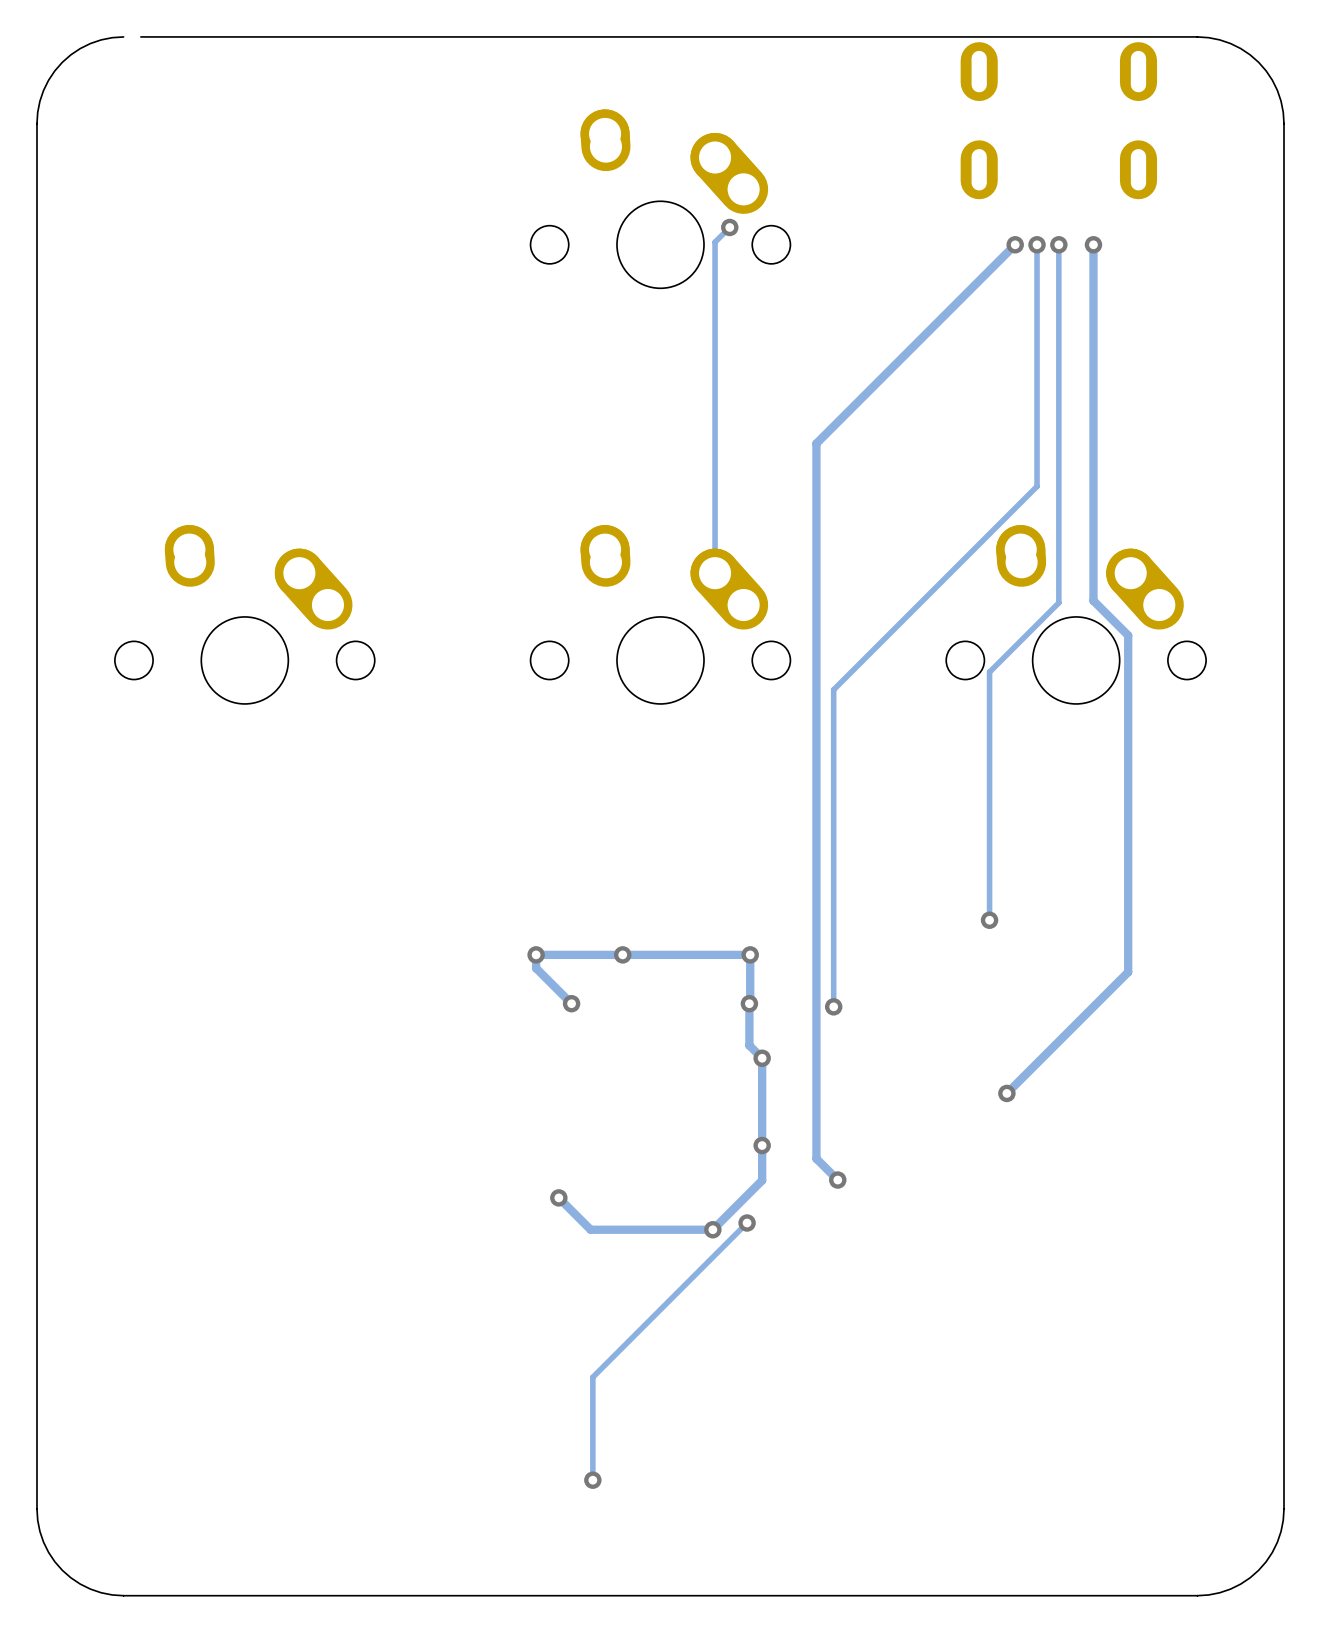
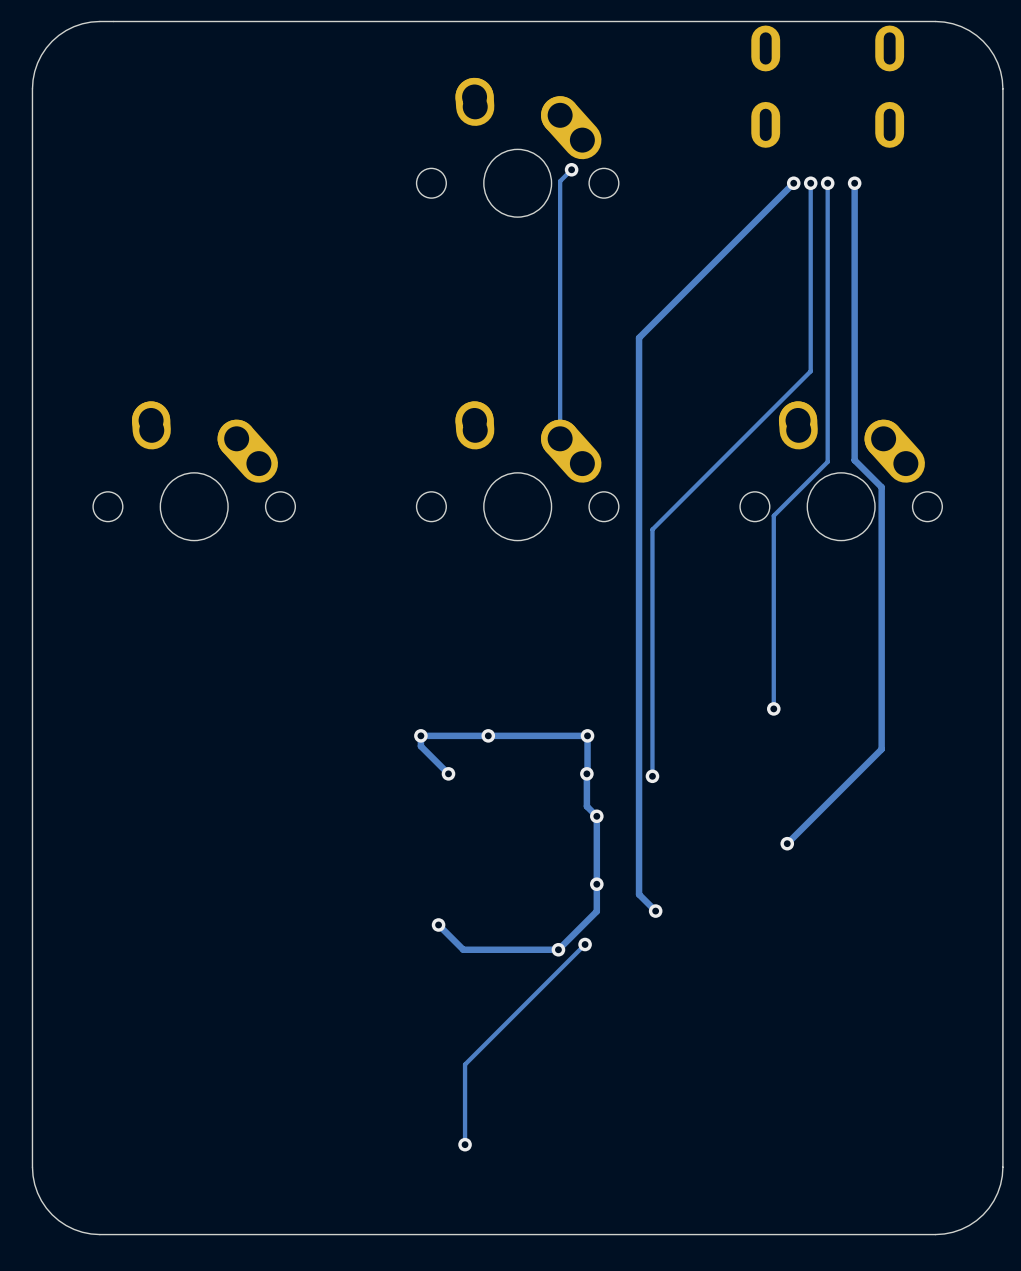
board edge: none -> (113, 21) (99, 21)

